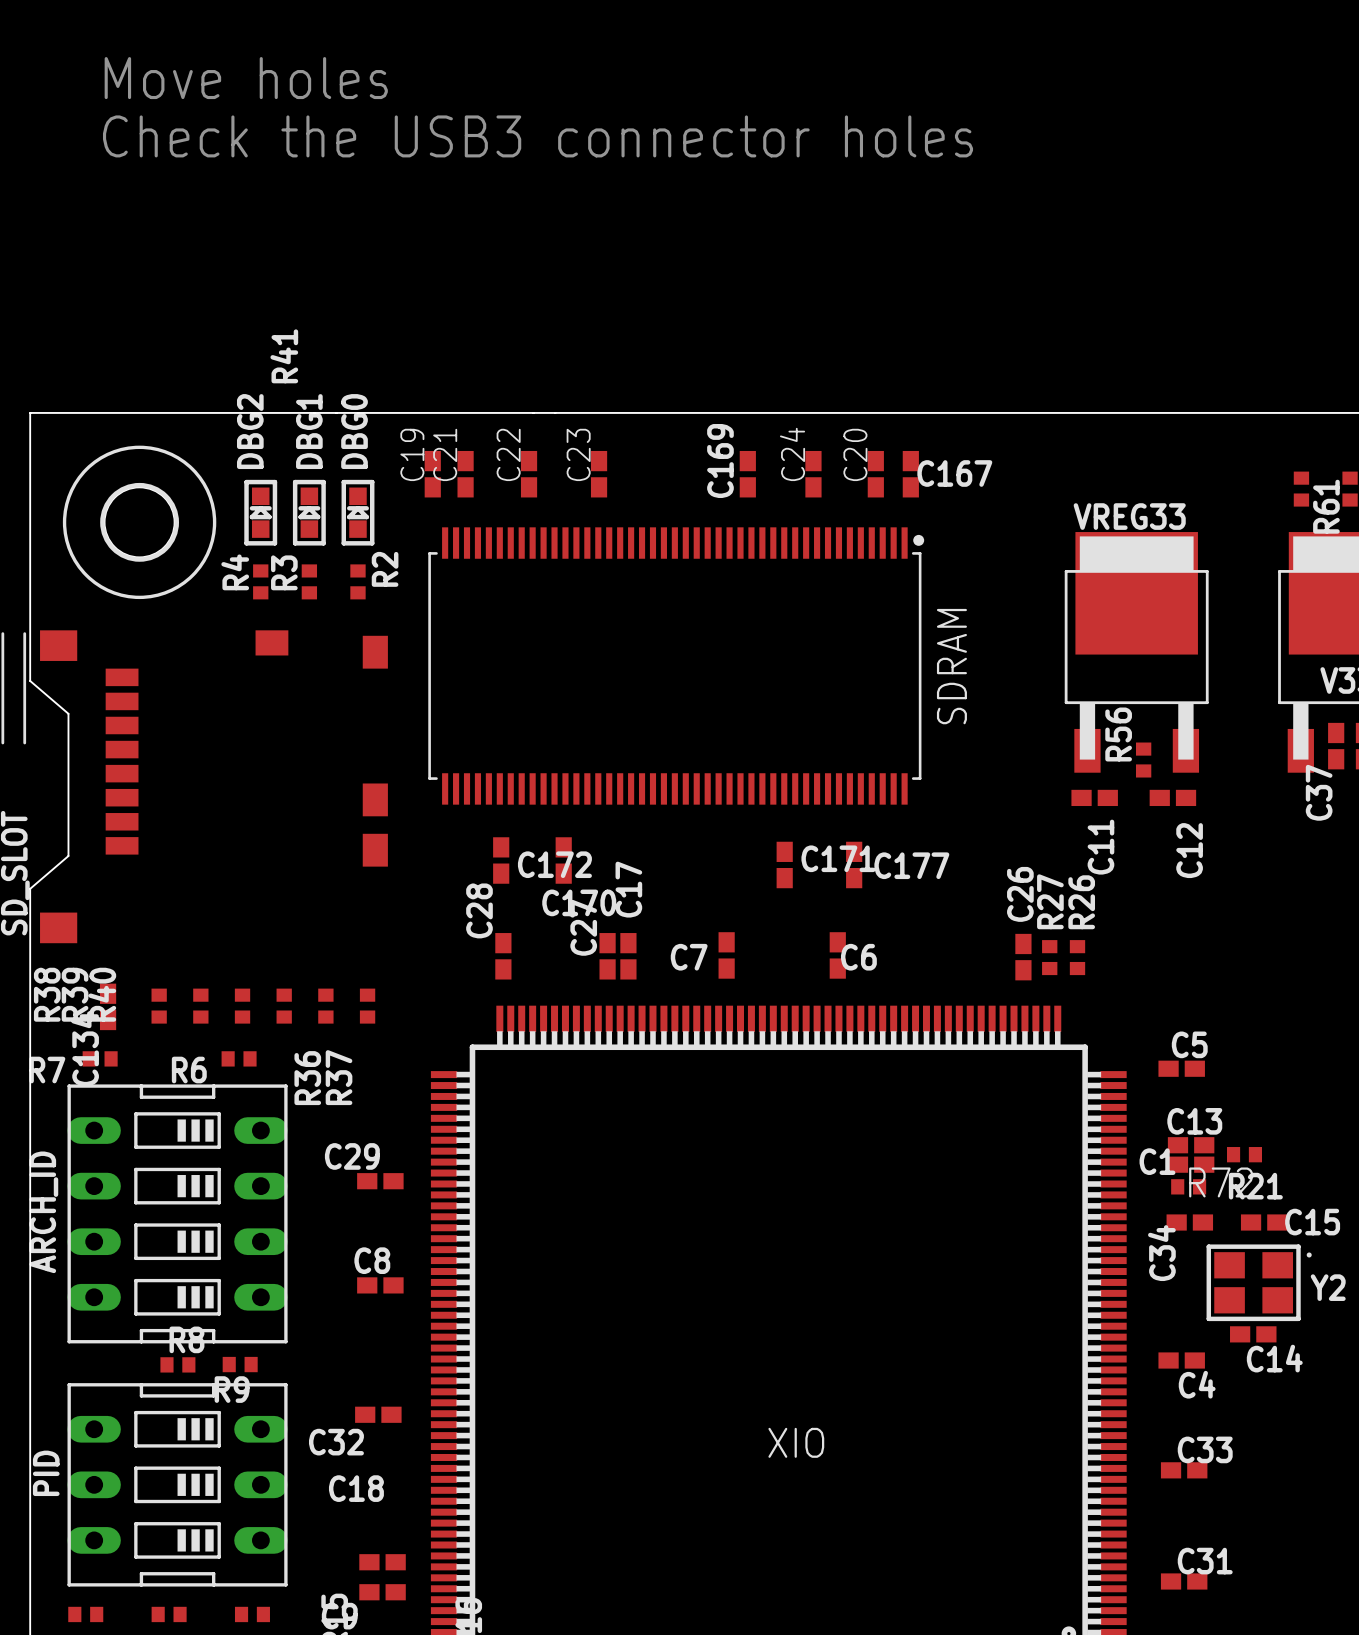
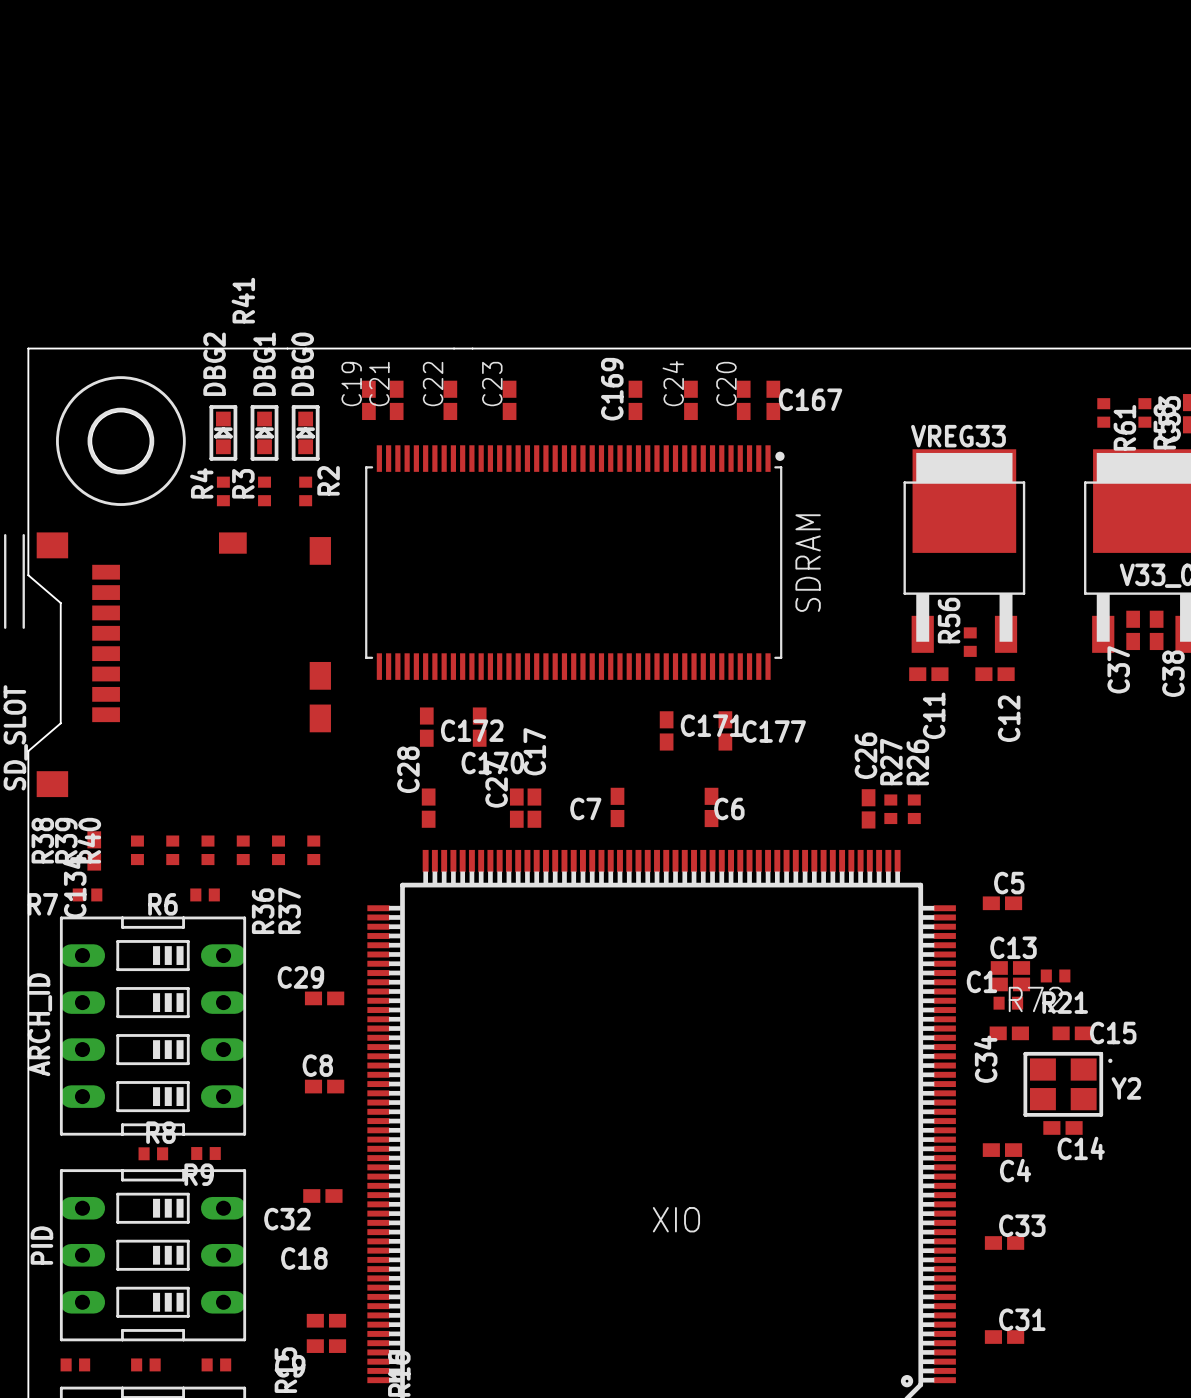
text: Move holes (246, 78) -> none
text: Check the USB3 connector holes (538, 136) -> none

